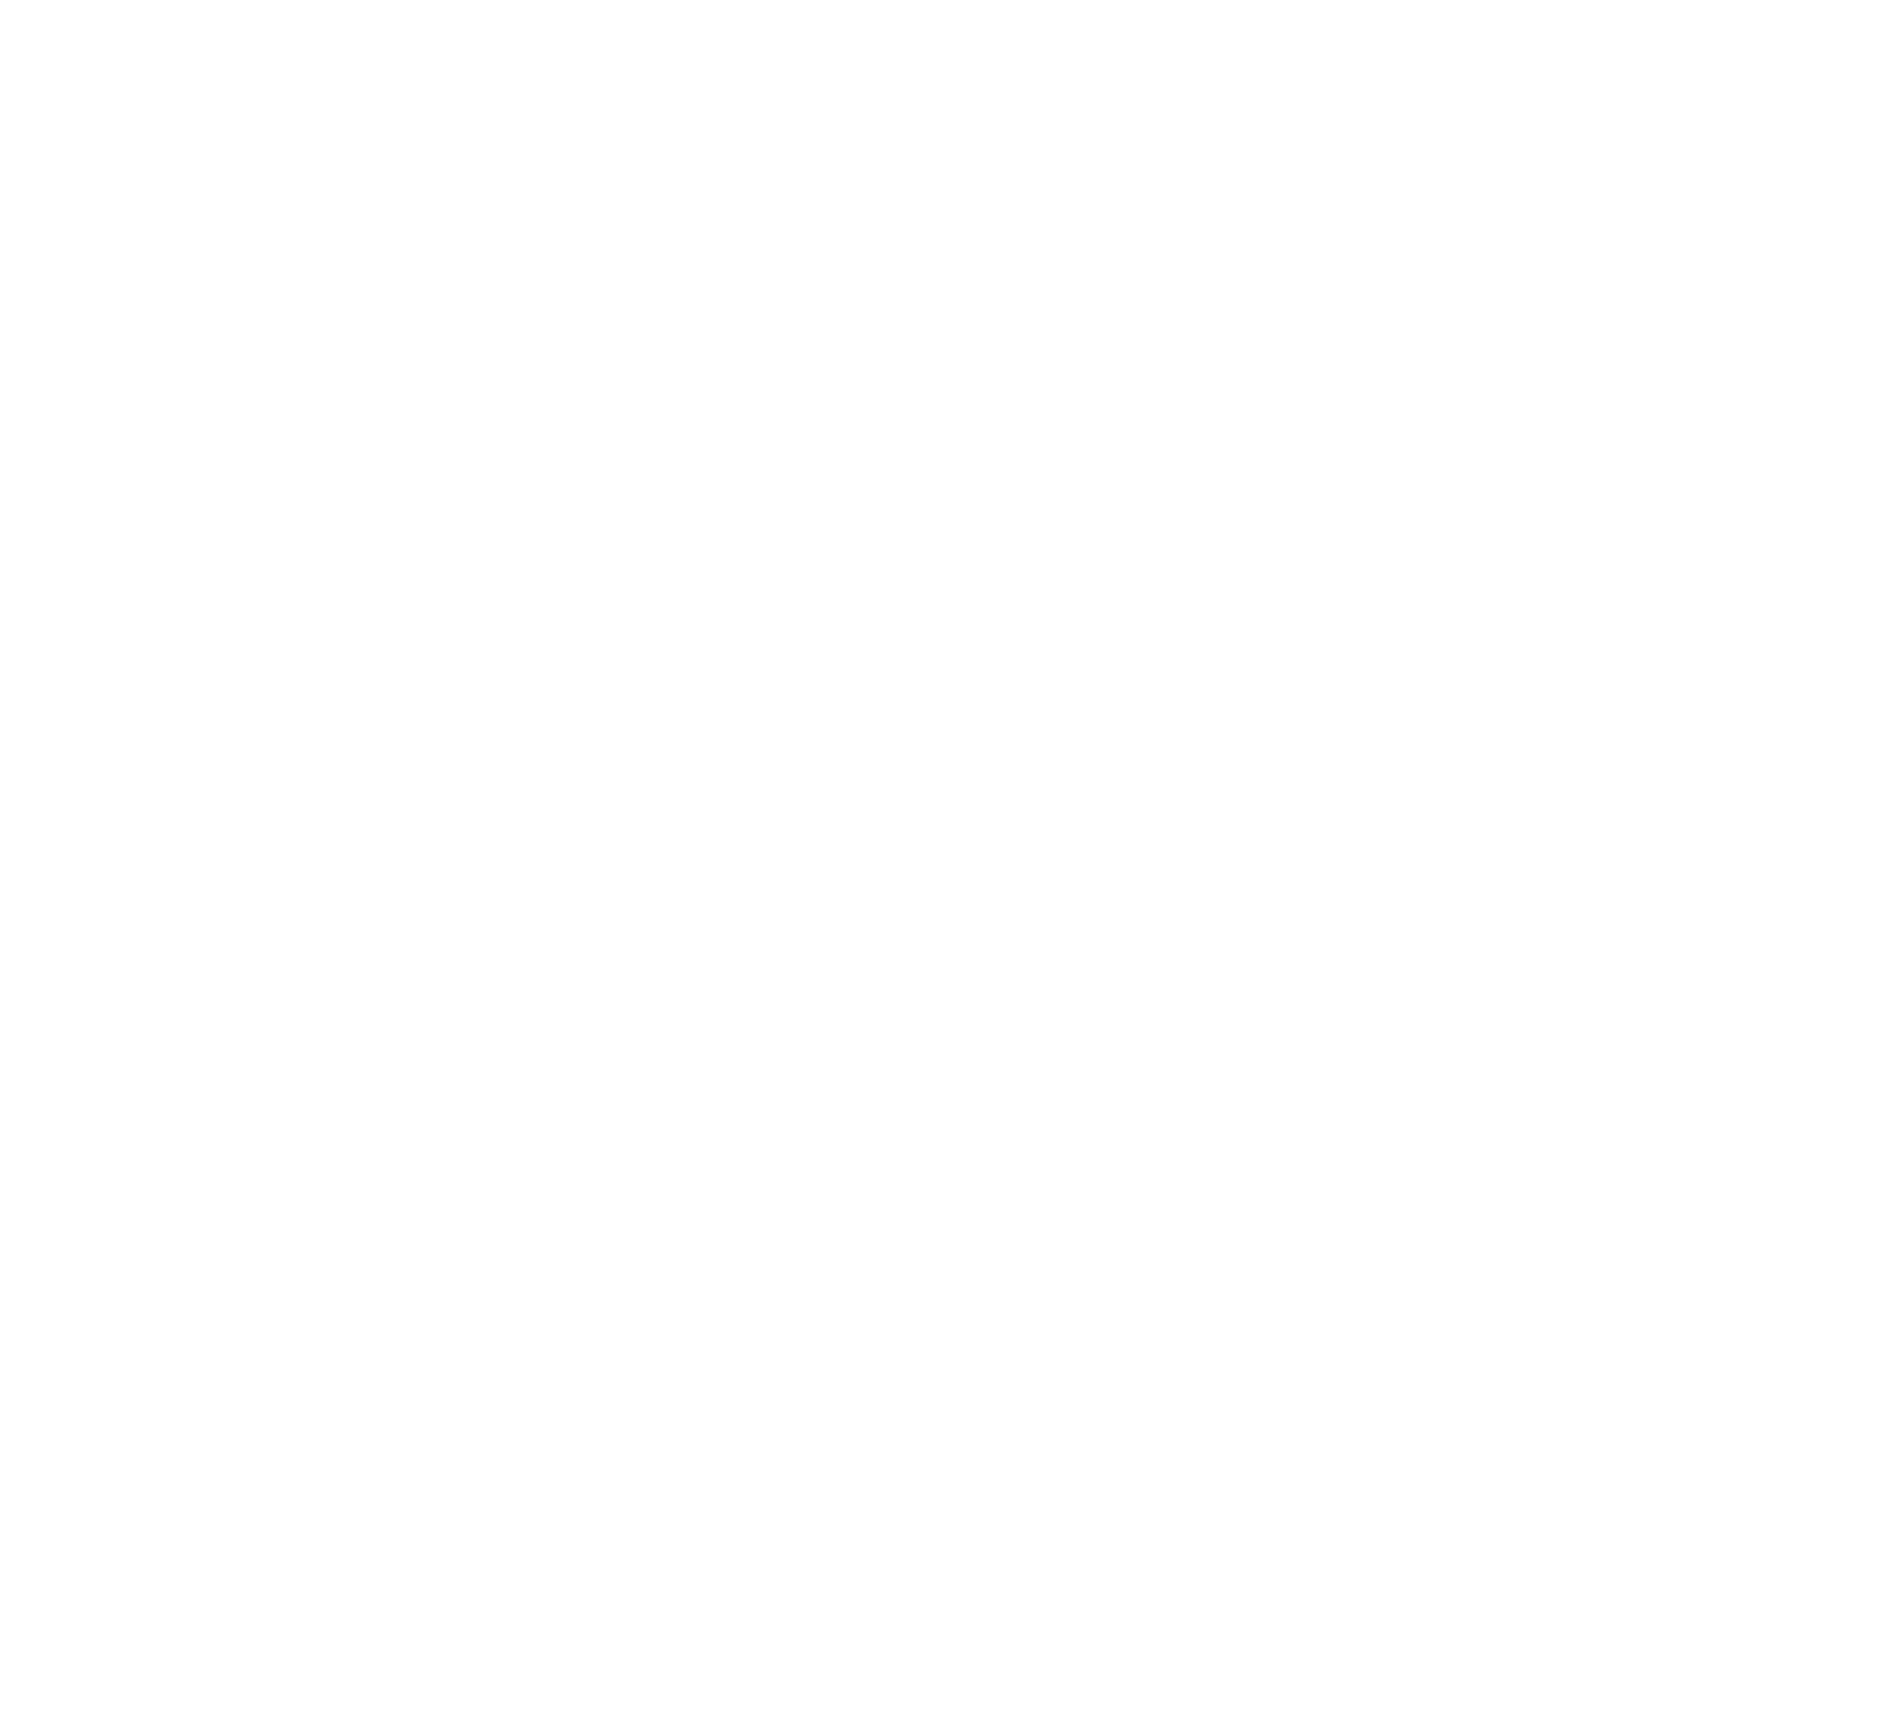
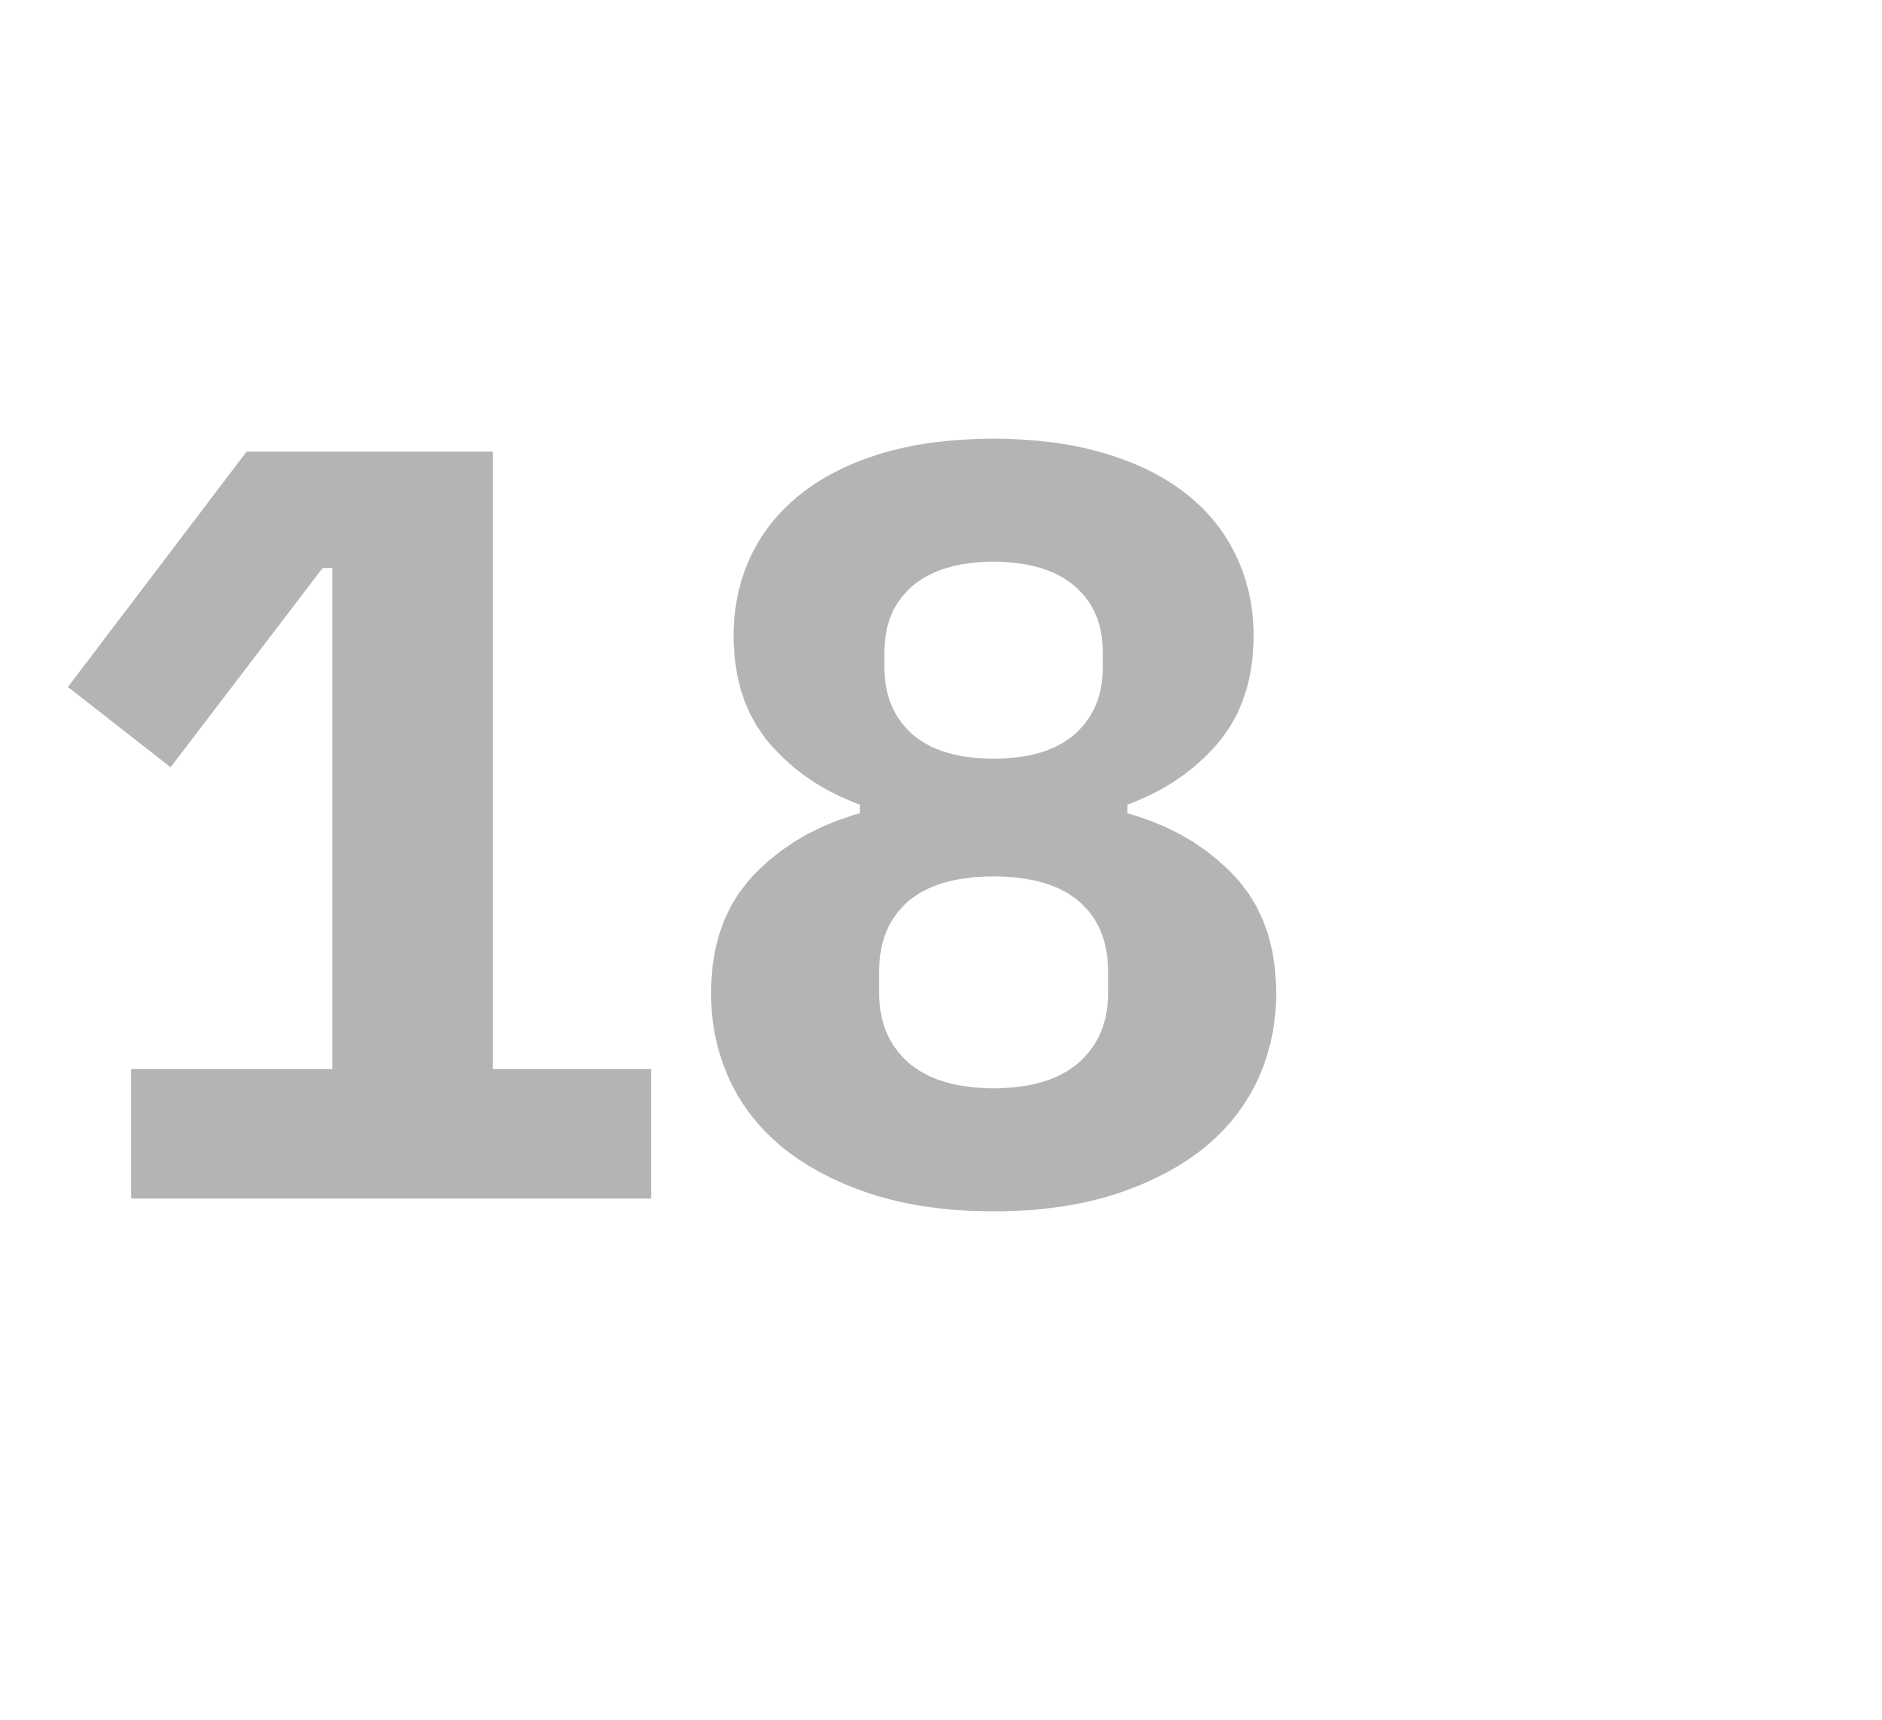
text: none -> 18 (672, 825)

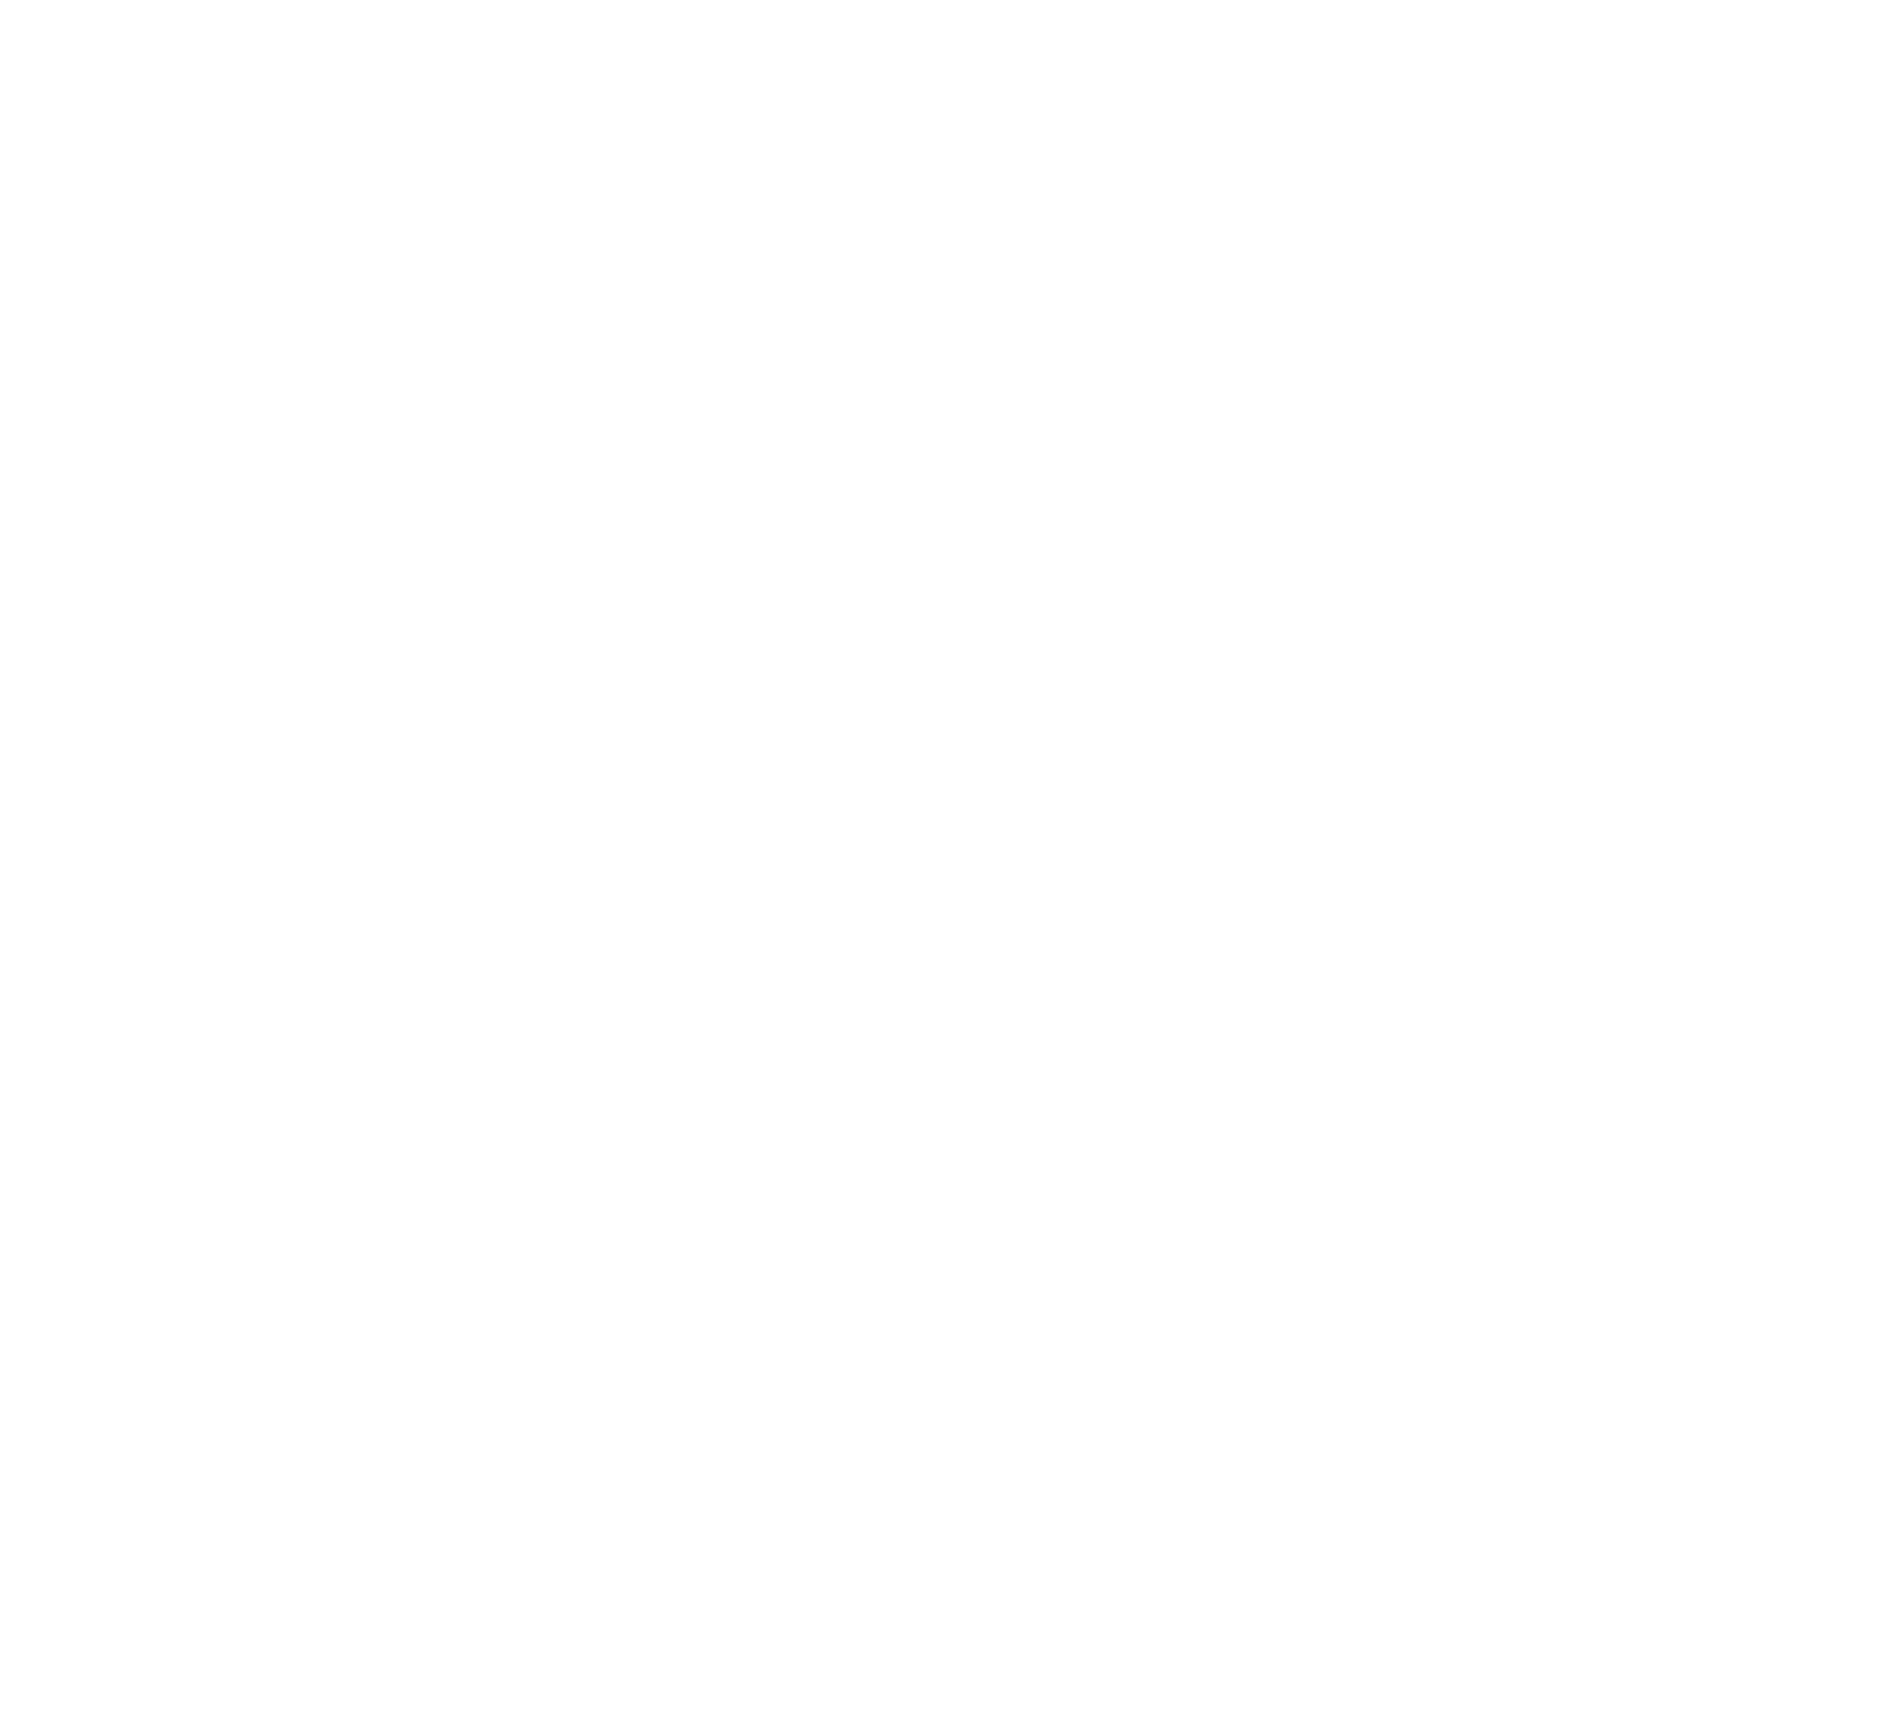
text: 18 (672, 825) -> none

